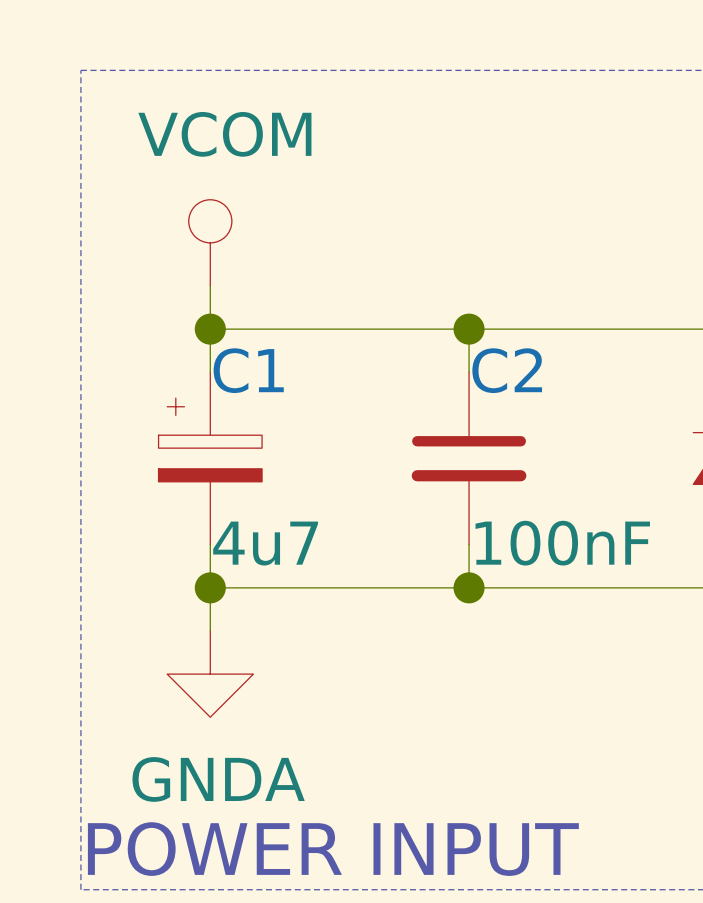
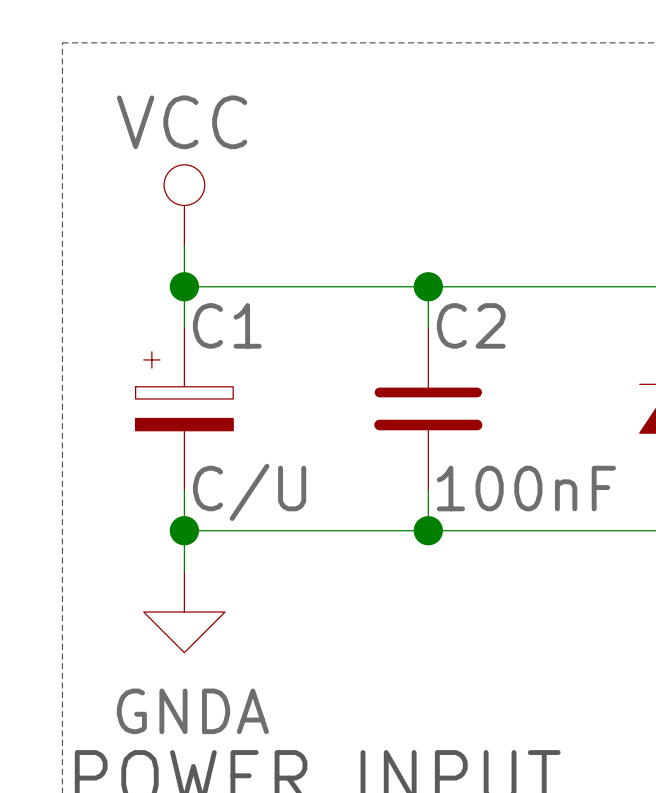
power symbol: VCOM (210, 242) -> VCC (184, 205)
C1 value: 4u7 (265, 543) -> C/U (249, 492)

